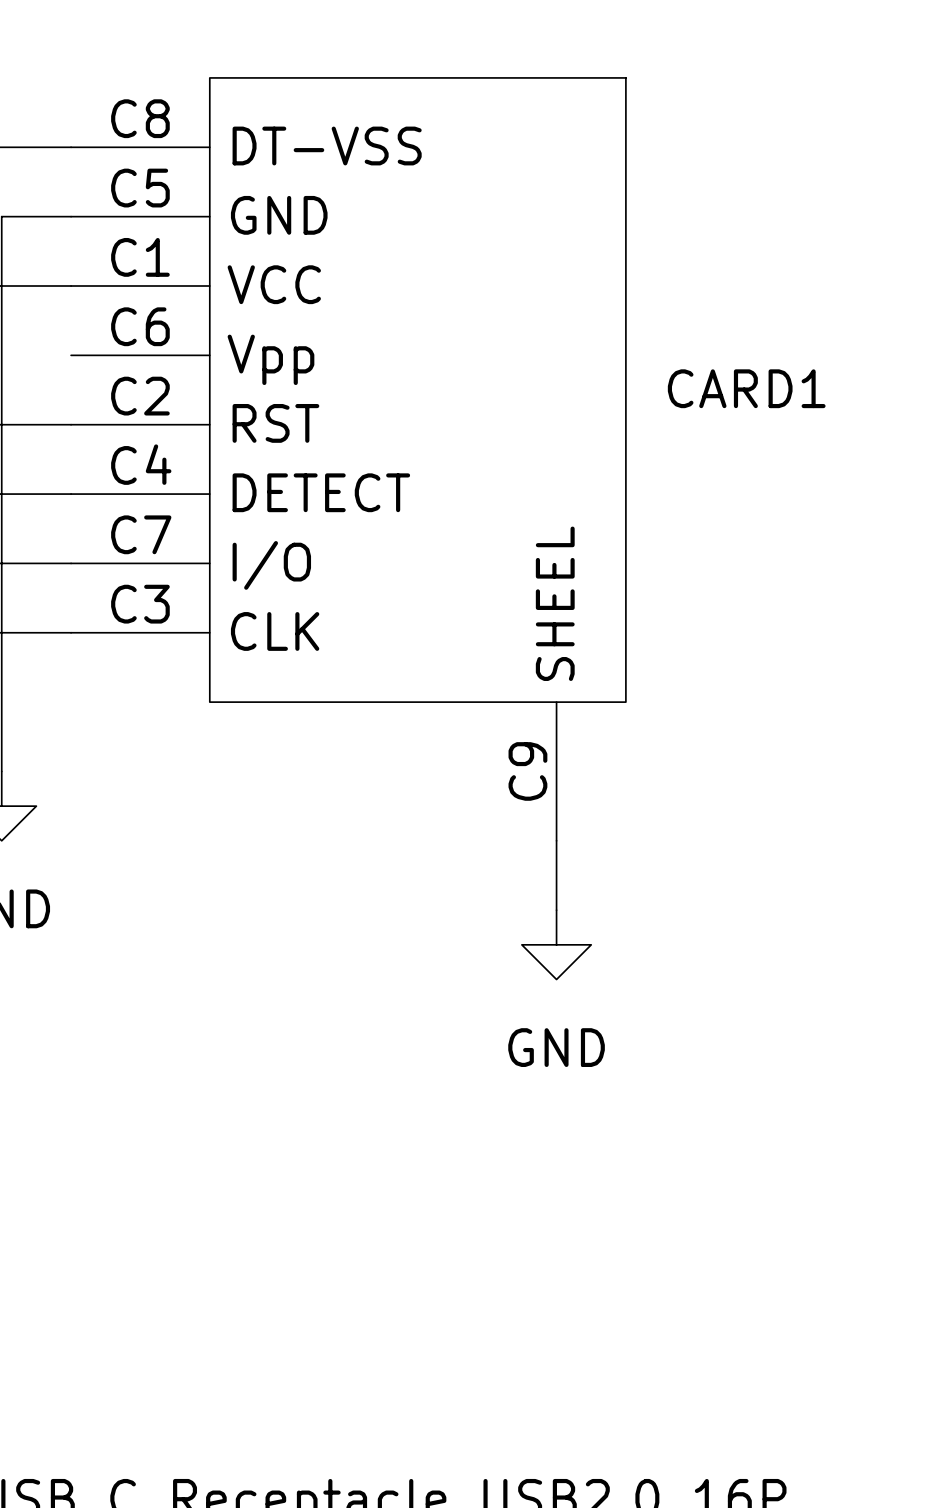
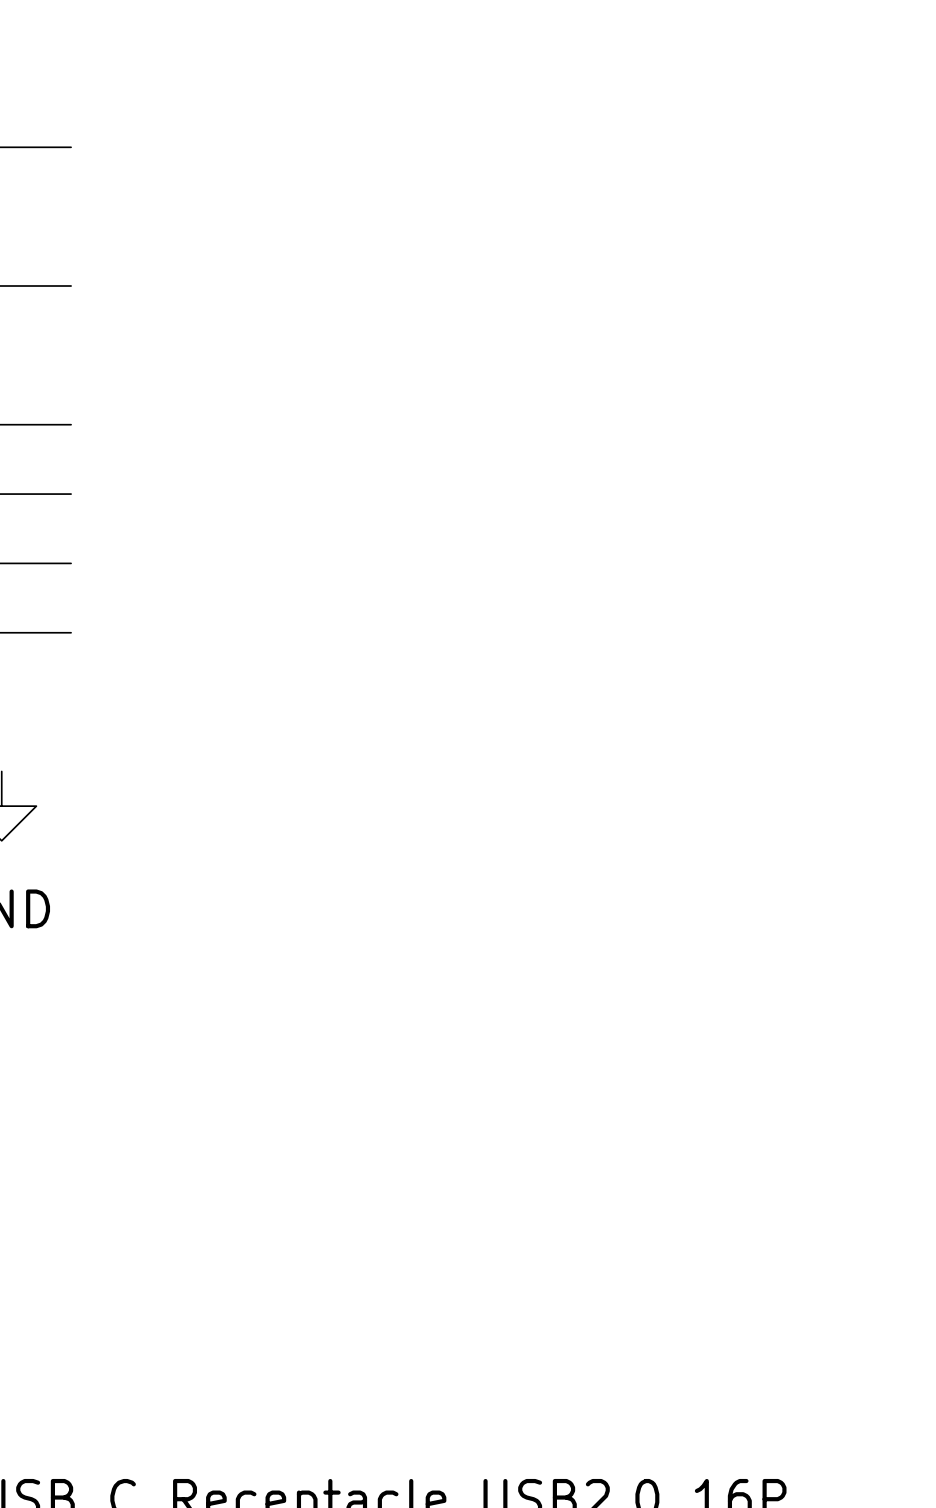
wire: (71, 216) (1, 216) (1, 771) -> none
CARD1: (348, 459) -> none
wire: (556, 840) (556, 910) -> none
power symbol: GND (556, 944) -> none

